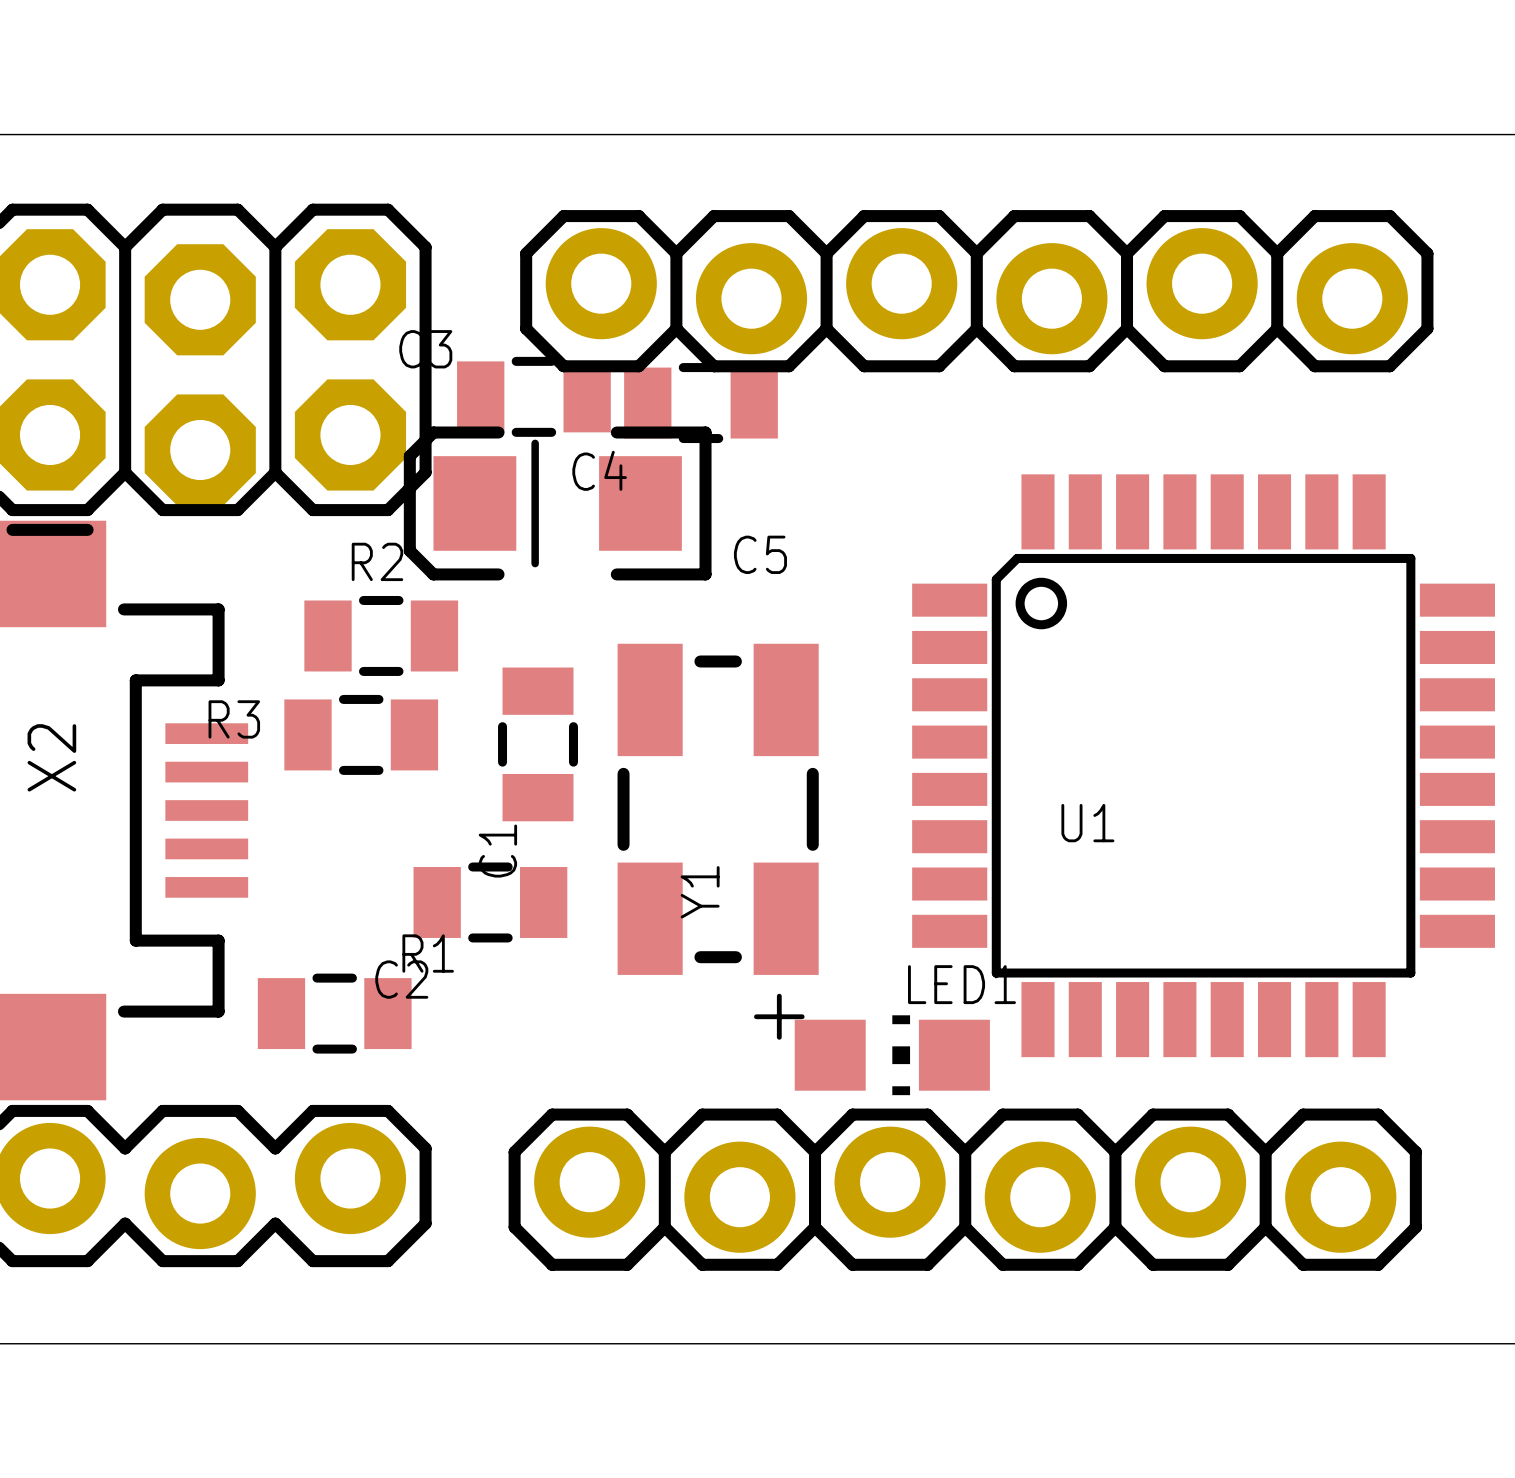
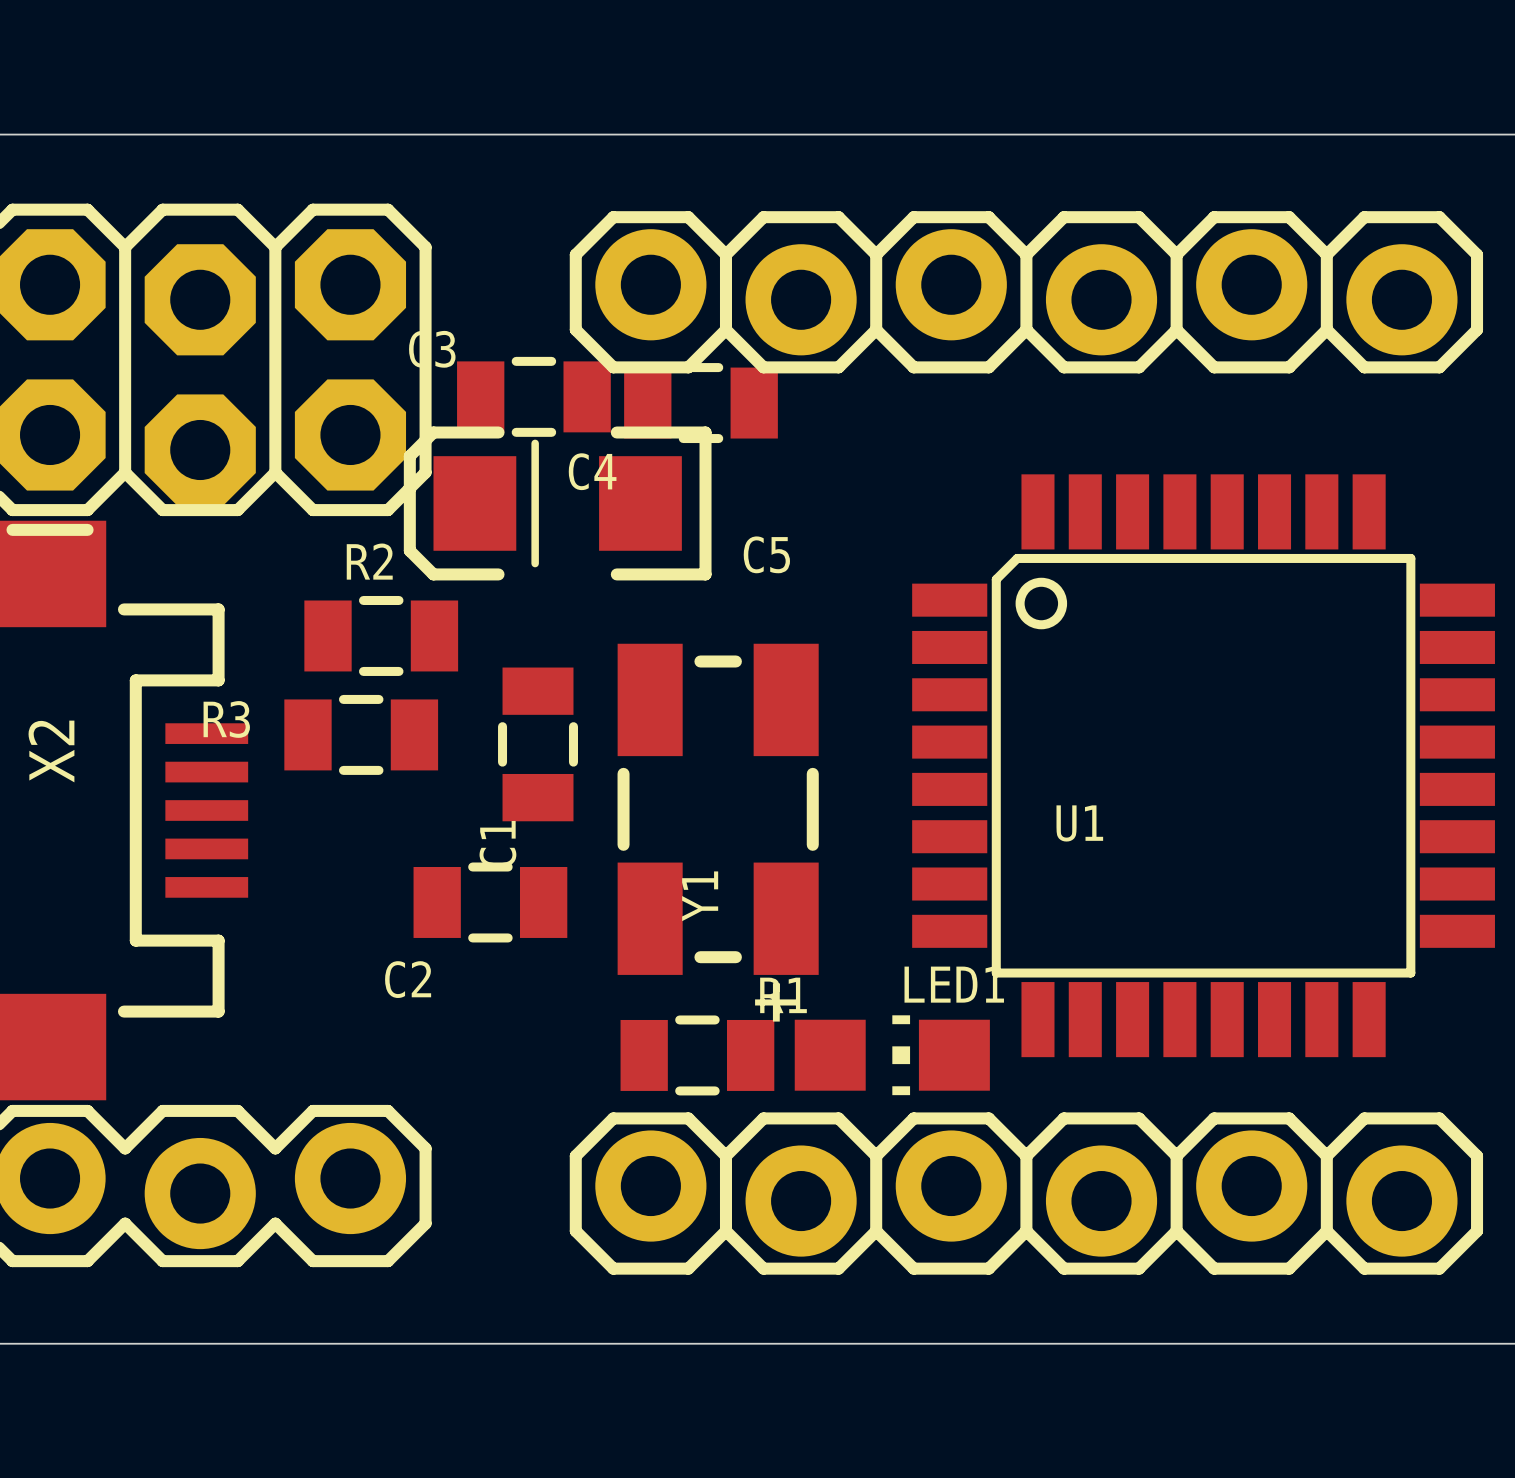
part position: (976, 291) -> (1026, 292)
R1 position: (334, 1013) -> (697, 1055)
part position: (965, 1189) -> (1026, 1193)

